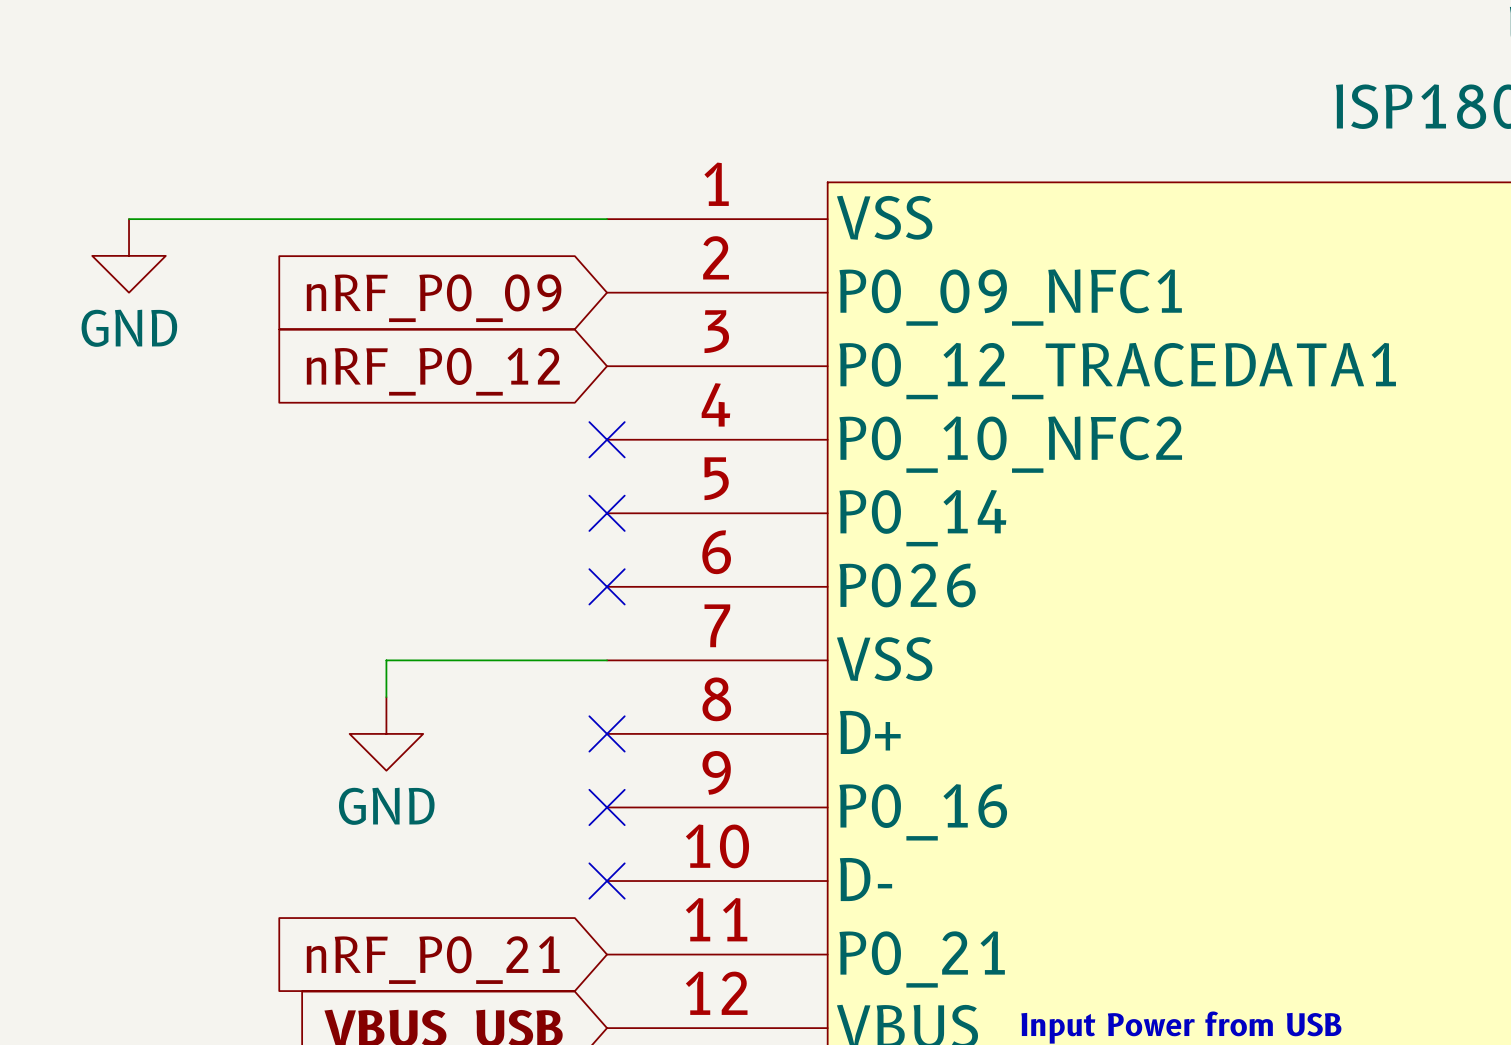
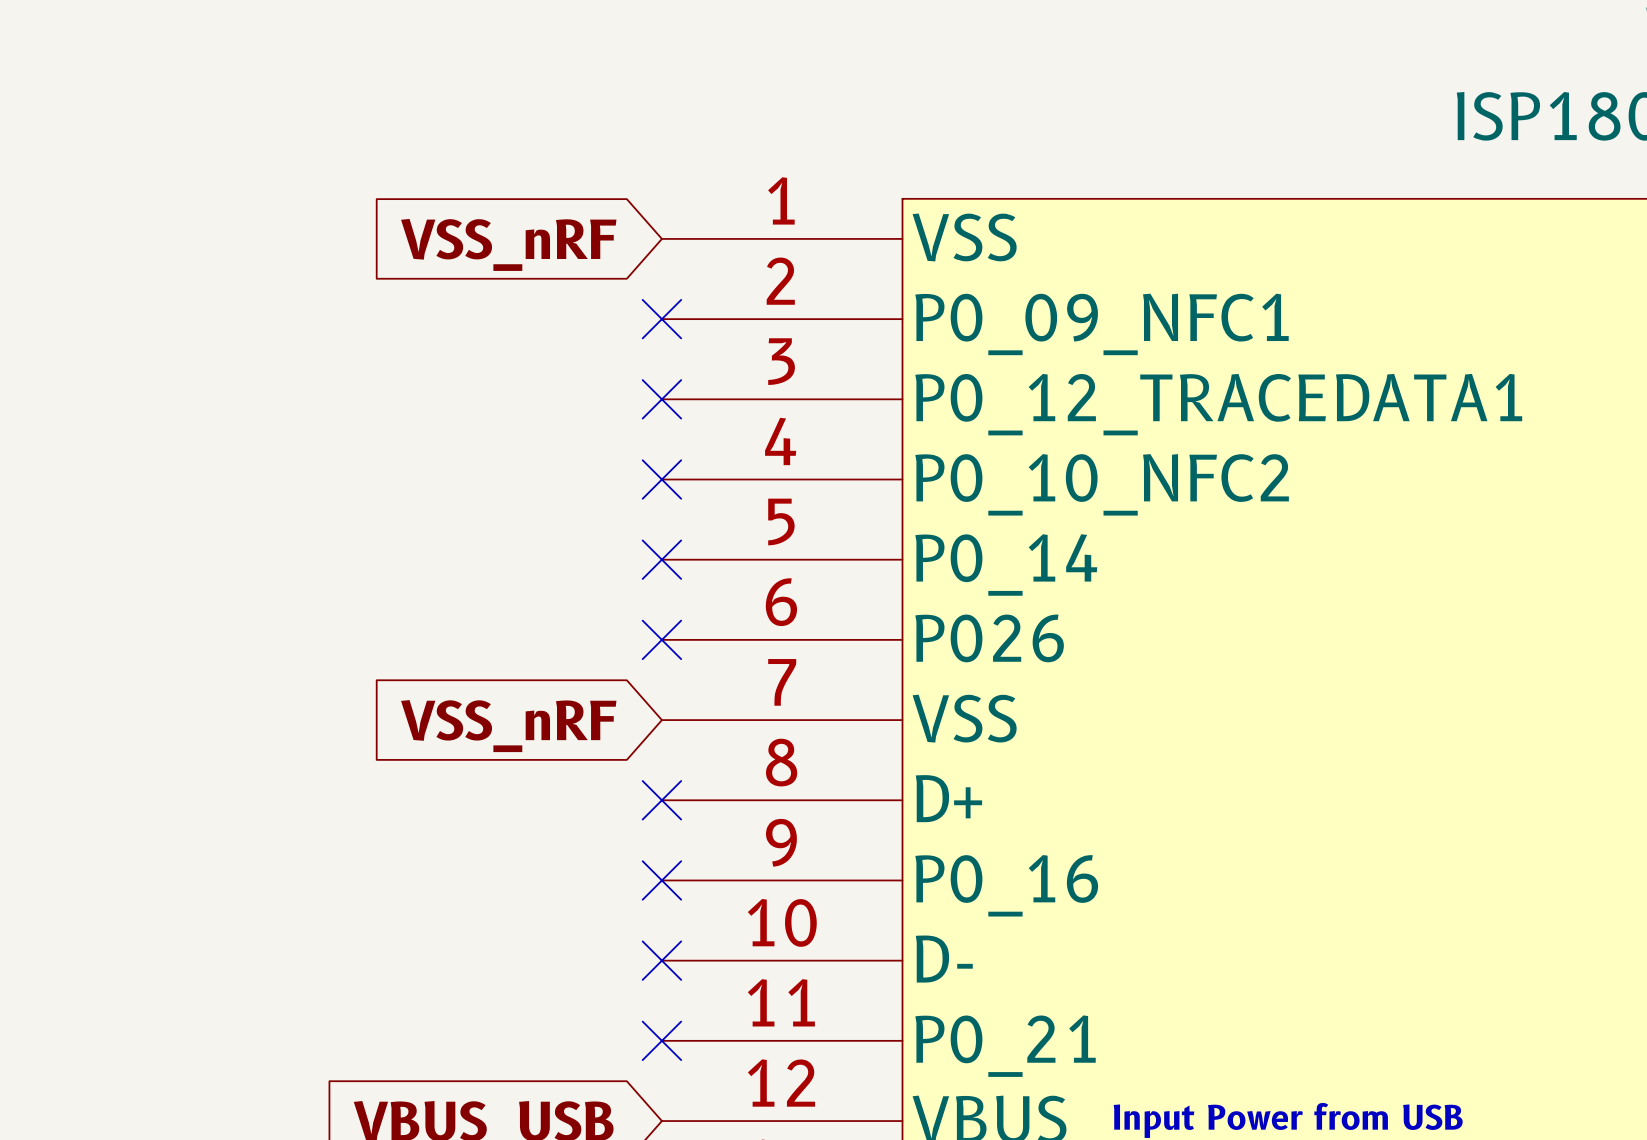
wire: (129, 219) (607, 219) -> none
global label: none -> VSS_nRF (508, 244)
power symbol: GND (129, 255) -> none
no-connect mark: none -> (661, 319)
global label: nRF_P0_09 (434, 298) -> none
no-connect mark: none -> (661, 399)
global label: nRF_P0_12 (433, 371) -> none
wire: (607, 660) (386, 660) (386, 697) -> none
global label: none -> VSS_nRF (508, 726)
power symbol: GND (386, 733) -> none
no-connect mark: none -> (661, 1040)
global label: nRF_P0_21 (433, 960) -> none

